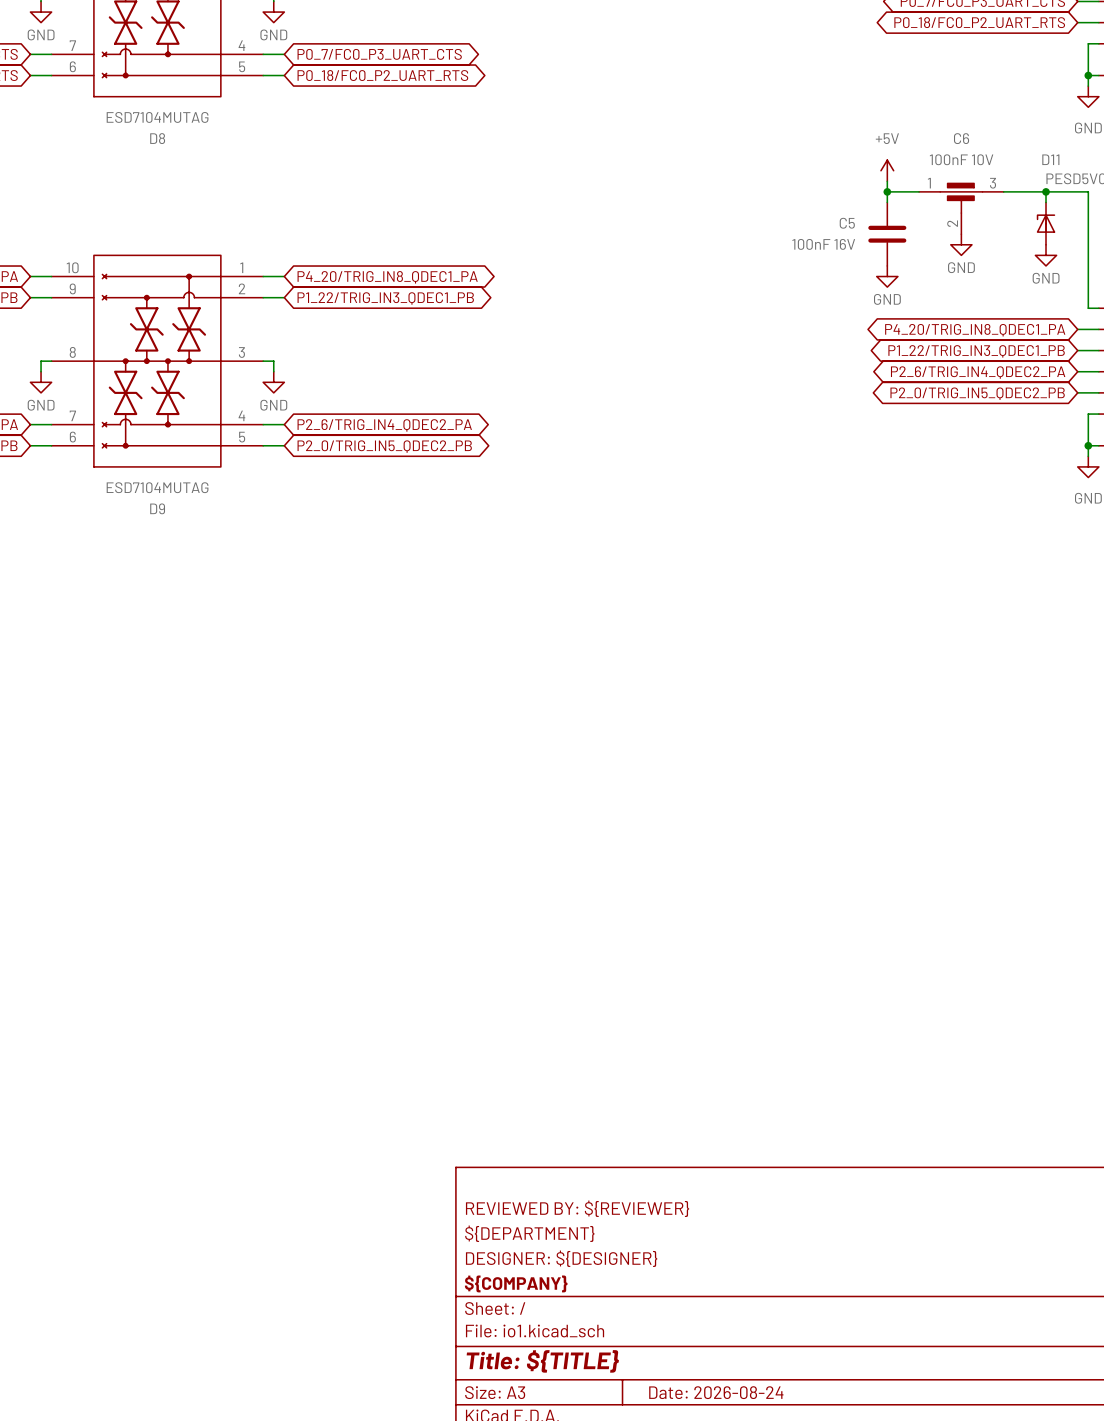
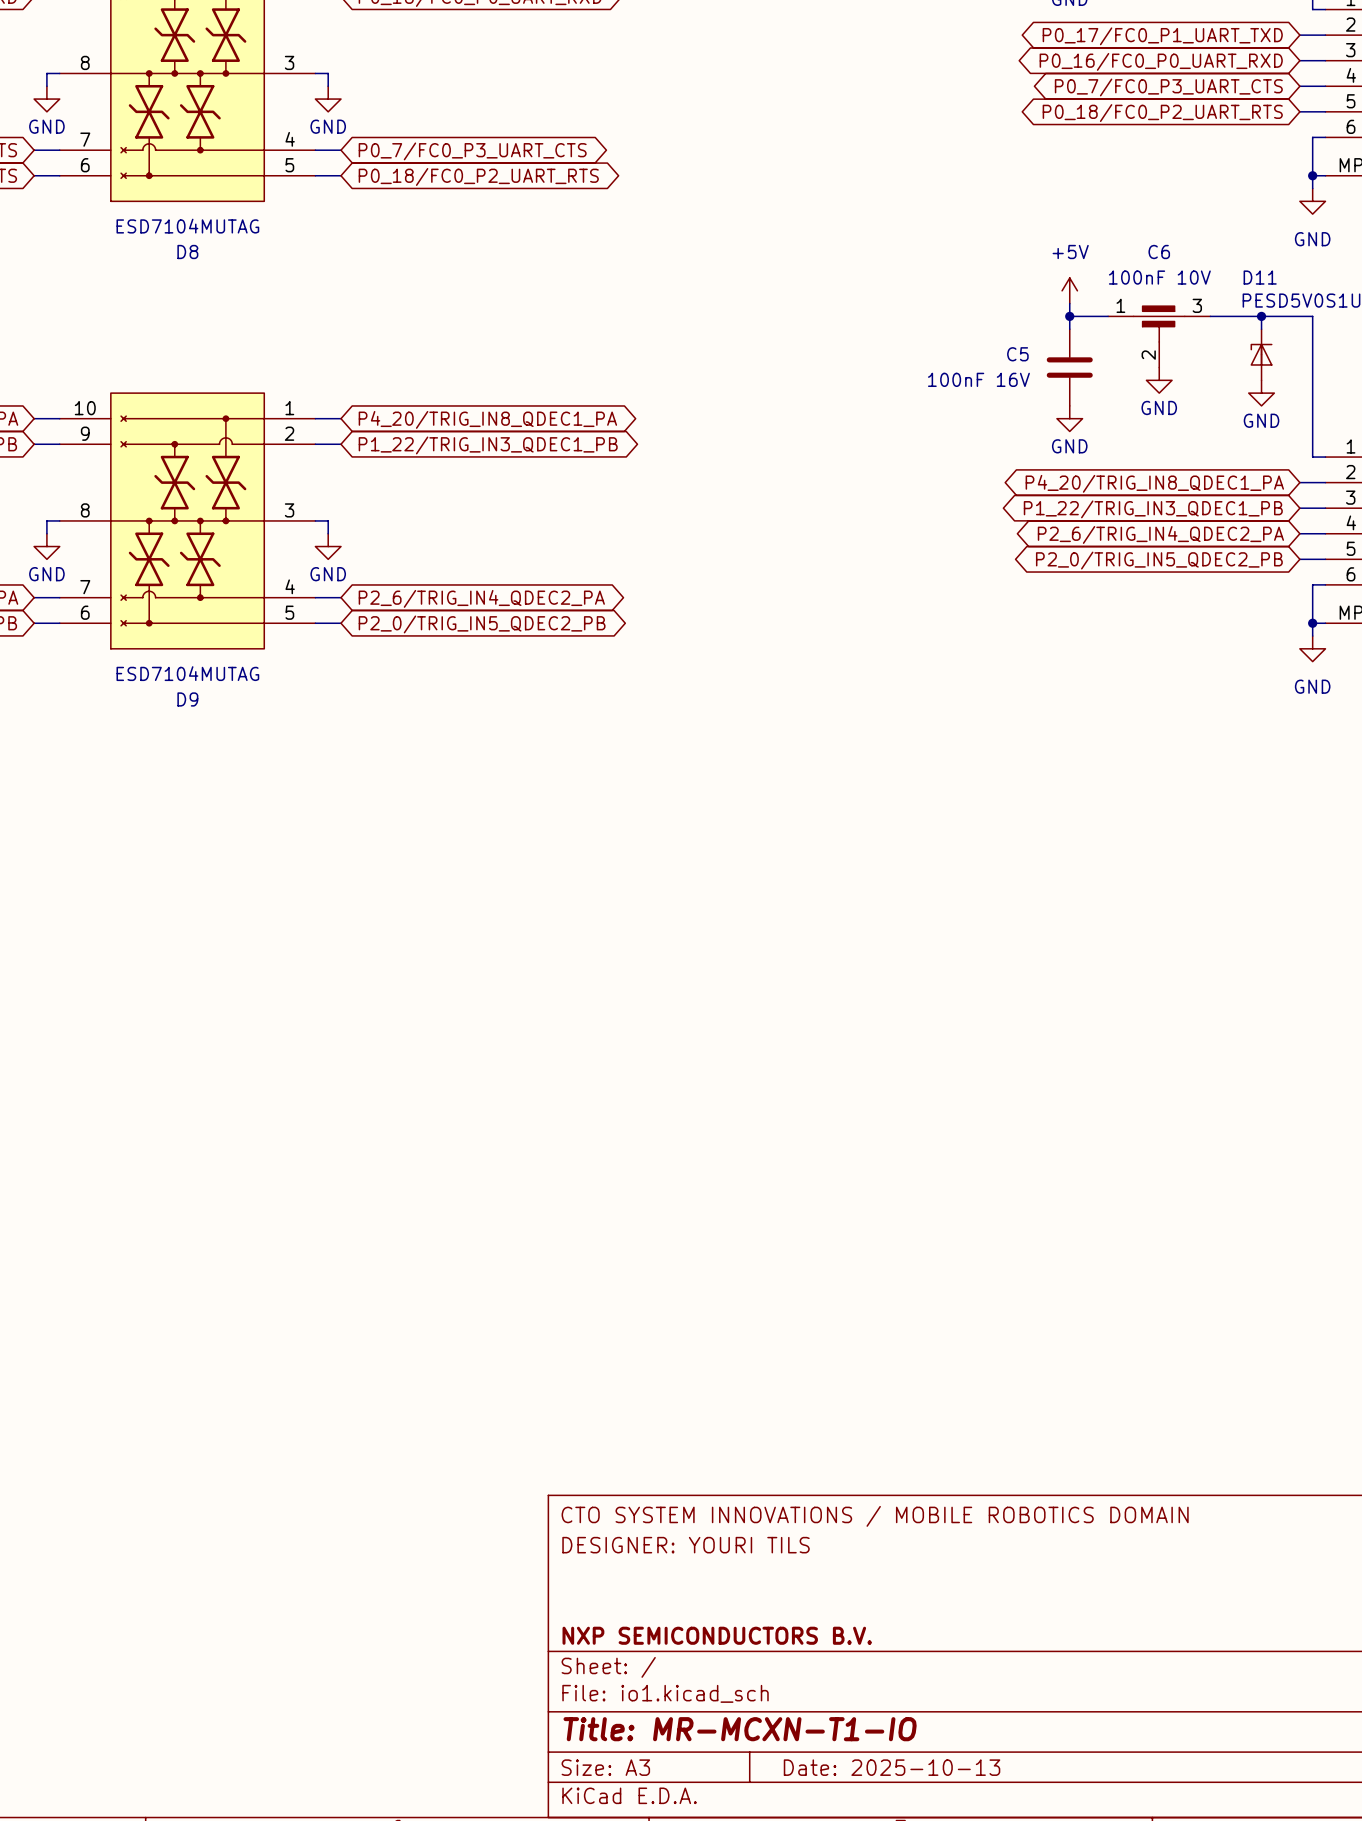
title block: none -> CTO SYSTEM INNOVATIONS / MOBILE ROBOTICS DOMAIN (875, 1516)
title block: REVIEWED BY: ${REVIEWER} (577, 1208) -> DESIGNER: YOURI TILS (686, 1545)
title block: ${DEPARTMENT} (529, 1233) -> none
title block: DESIGNER: ${DESIGNER} (561, 1258) -> none
title block: ${COMPANY} (516, 1283) -> NXP SEMICONDUCTORS B.V. (717, 1635)
title block: Title: ${TITLE} (542, 1361) -> Title: MR-MCXN-T1-IO (740, 1729)
title block: Date: 2026-08-24 (716, 1392) -> Date: 2025-10-13 (892, 1767)

